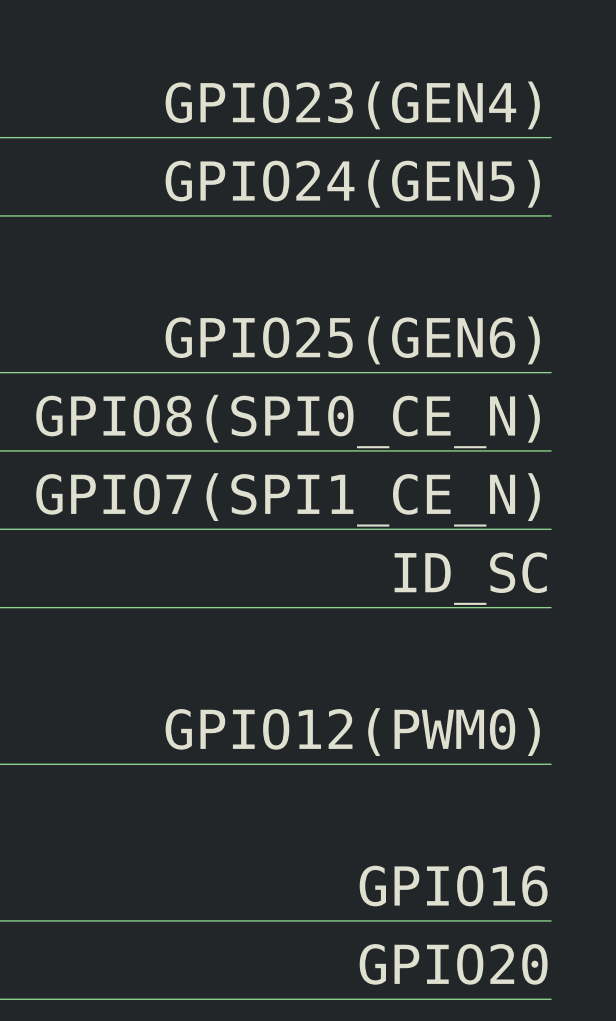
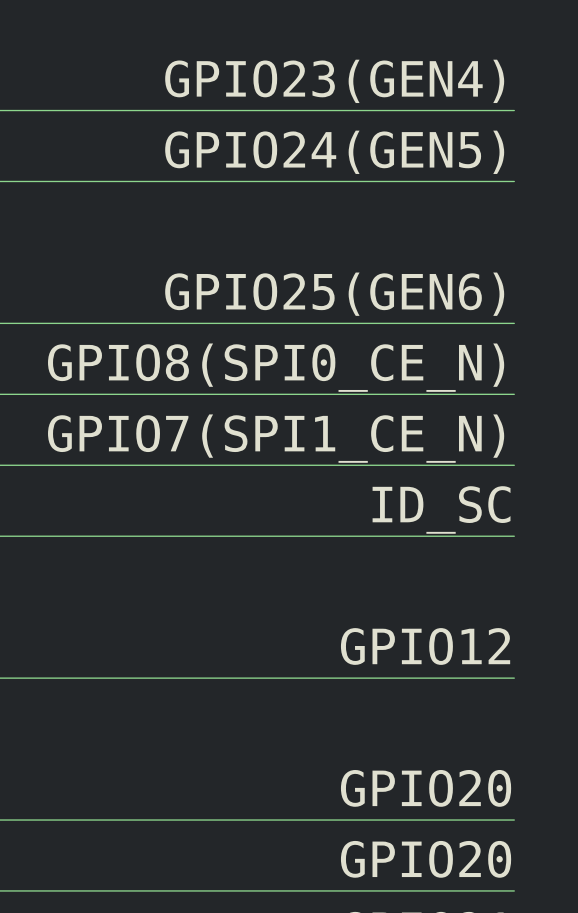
label: GPIO12(PWM0) (352, 732) -> GPIO12 (425, 646)
label: GPIO16 (453, 886) -> GPIO20 (426, 788)

